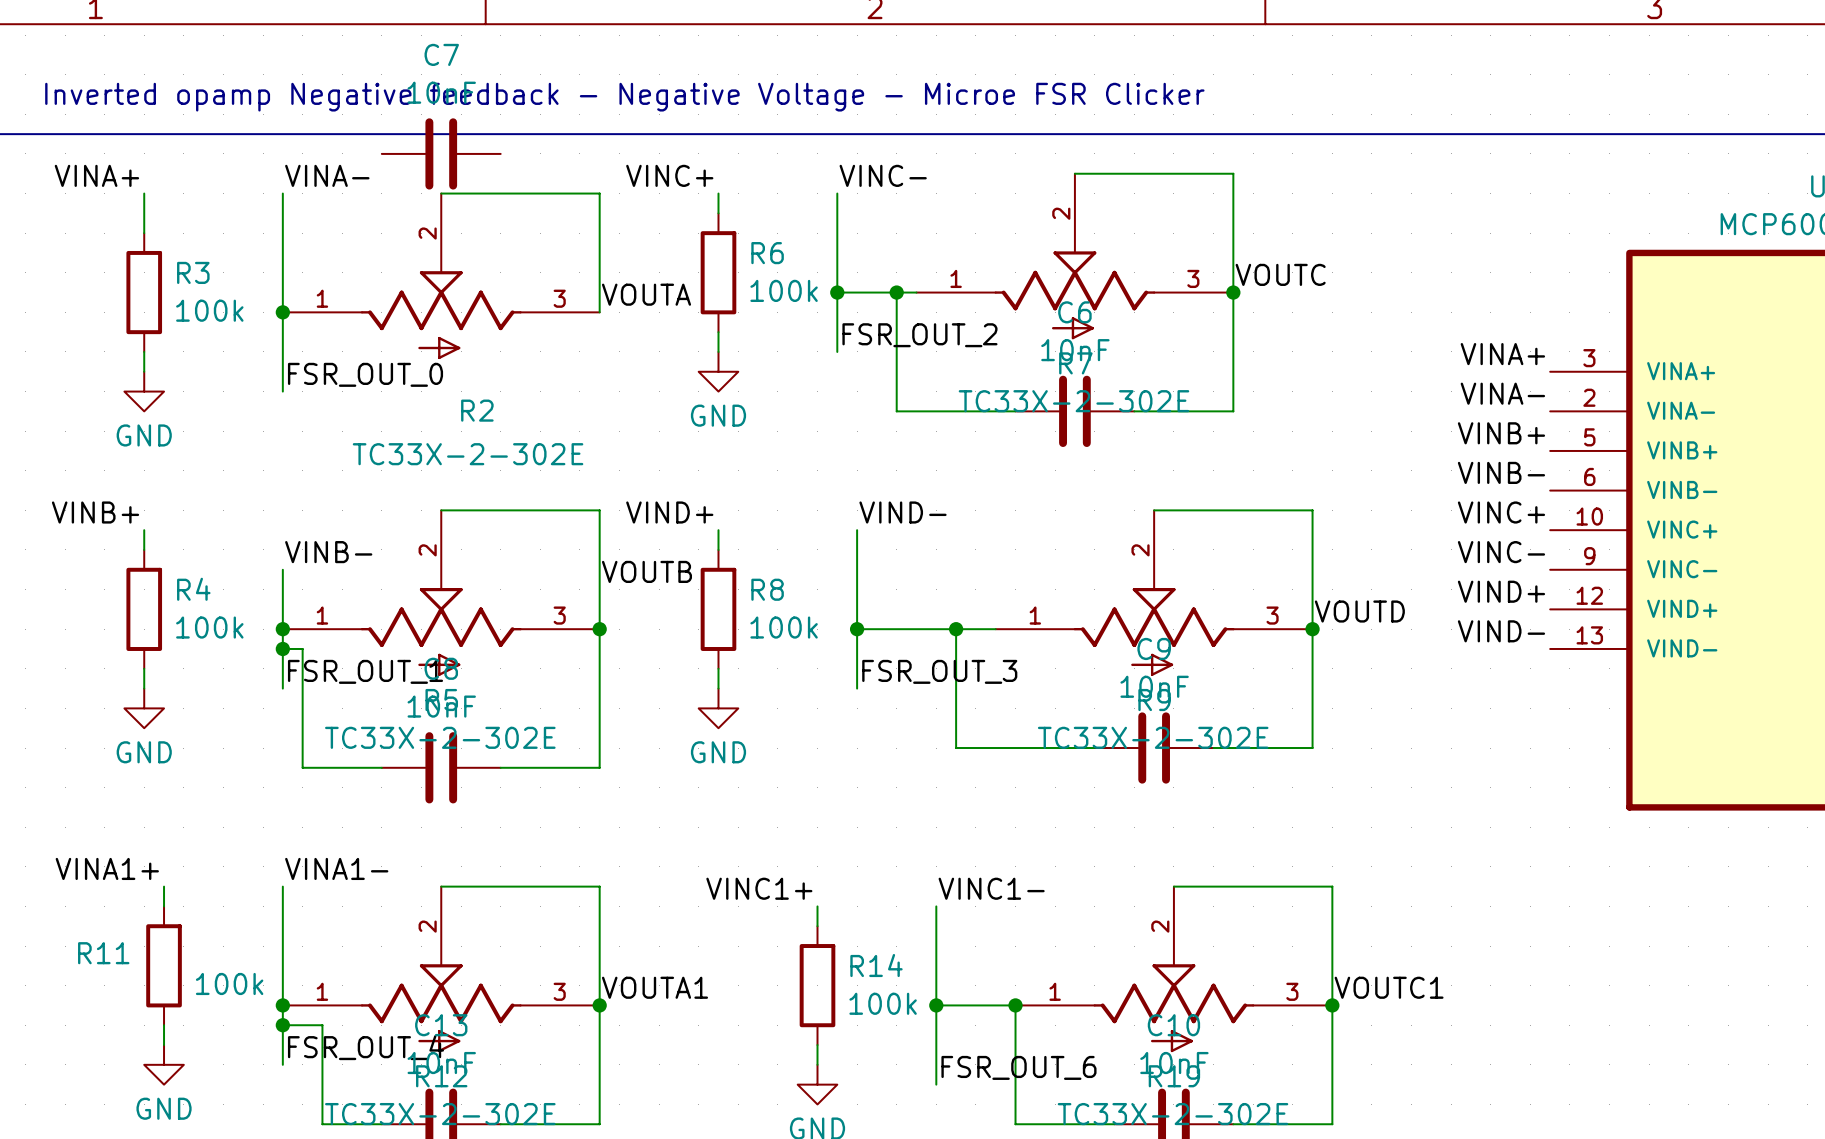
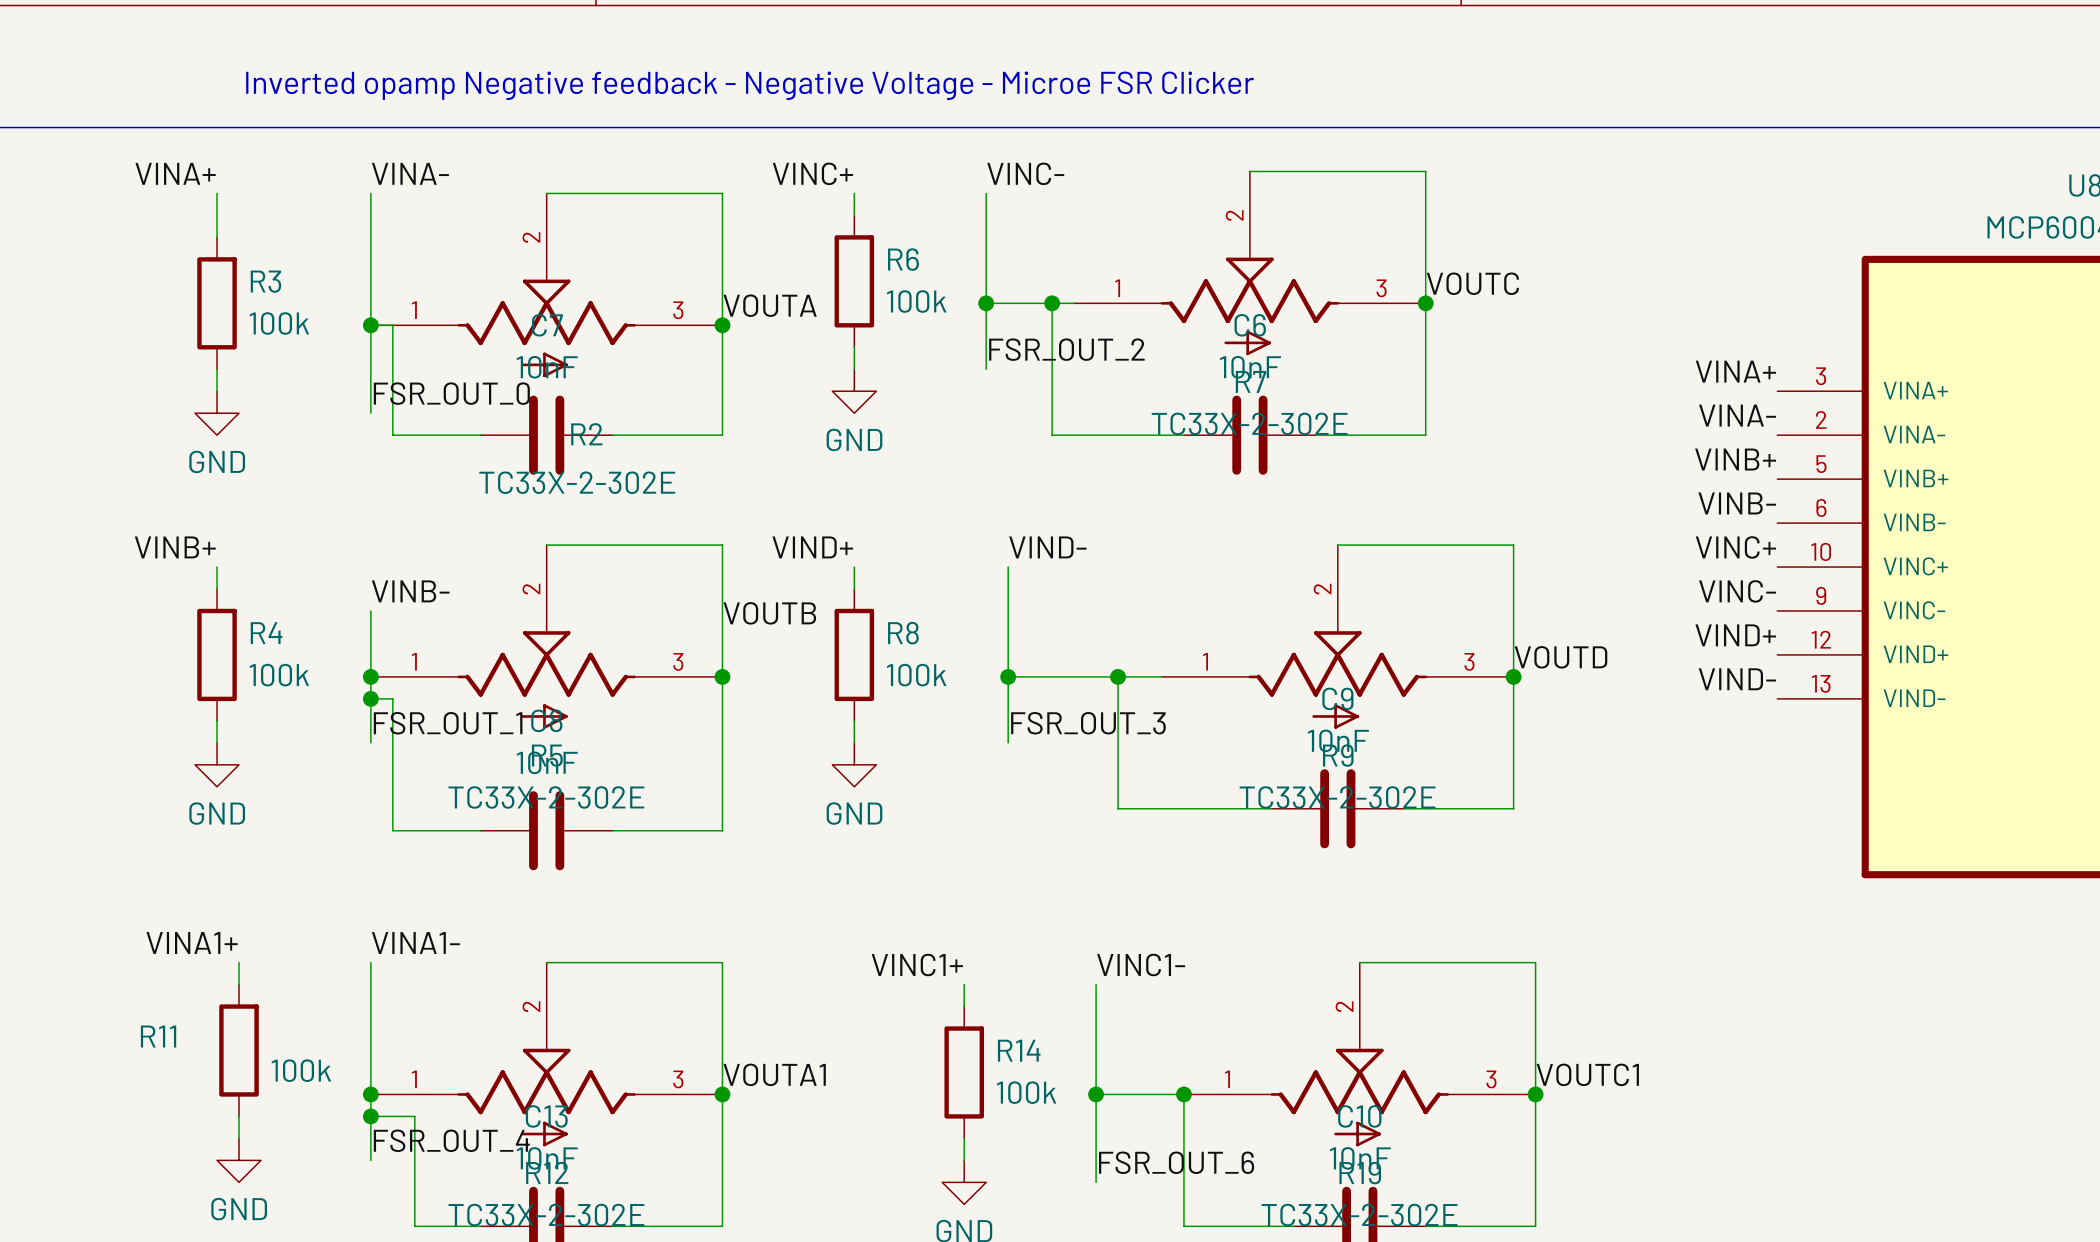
C7 position: (441, 153) -> (546, 435)
wire: none -> (370, 325) (392, 325) (392, 435) (480, 435)
wire: none -> (722, 325) (722, 435) (612, 435)
junction: none -> (722, 325)

